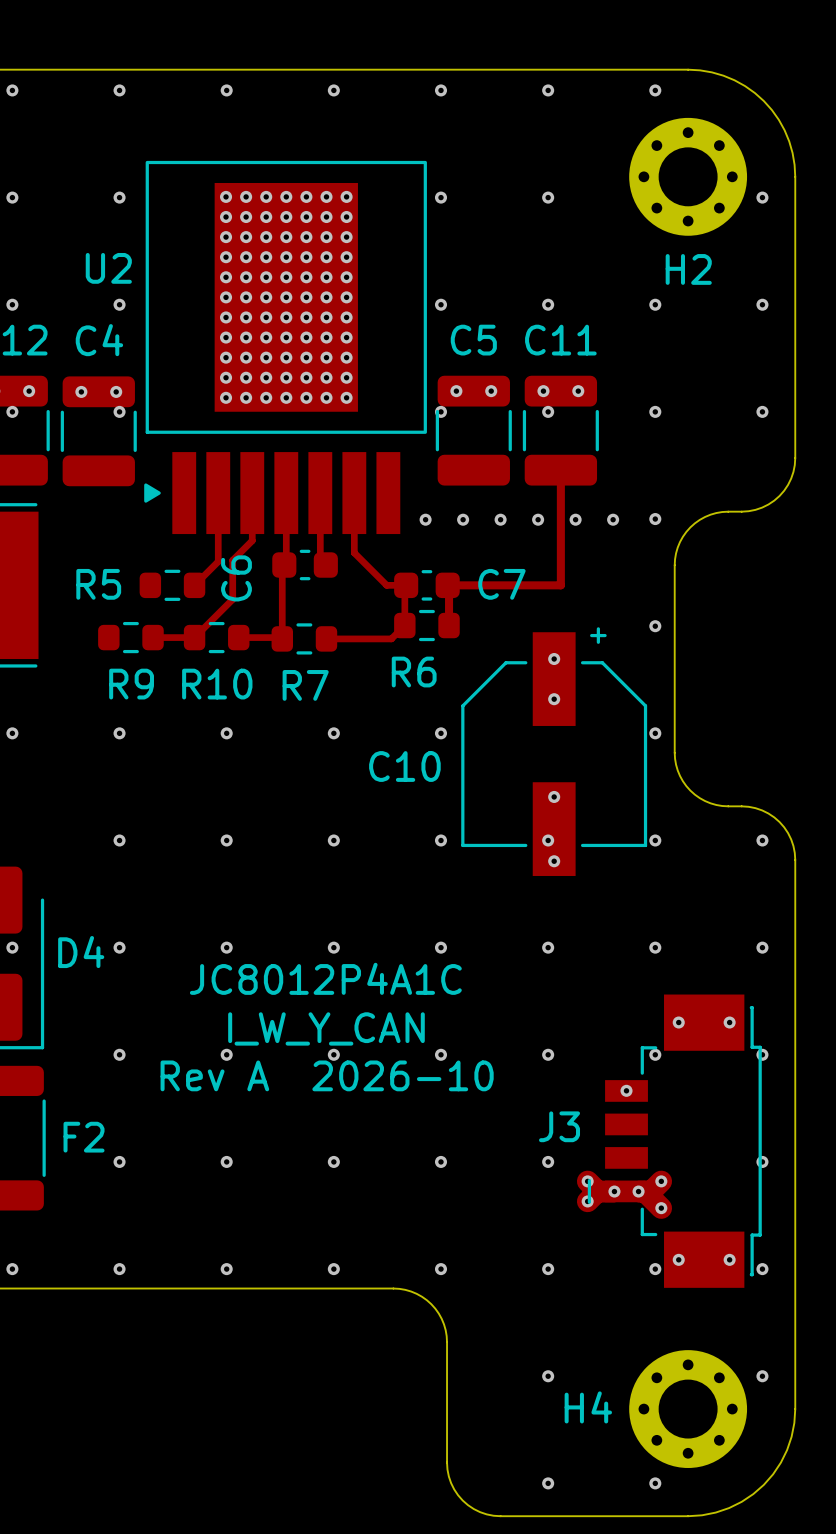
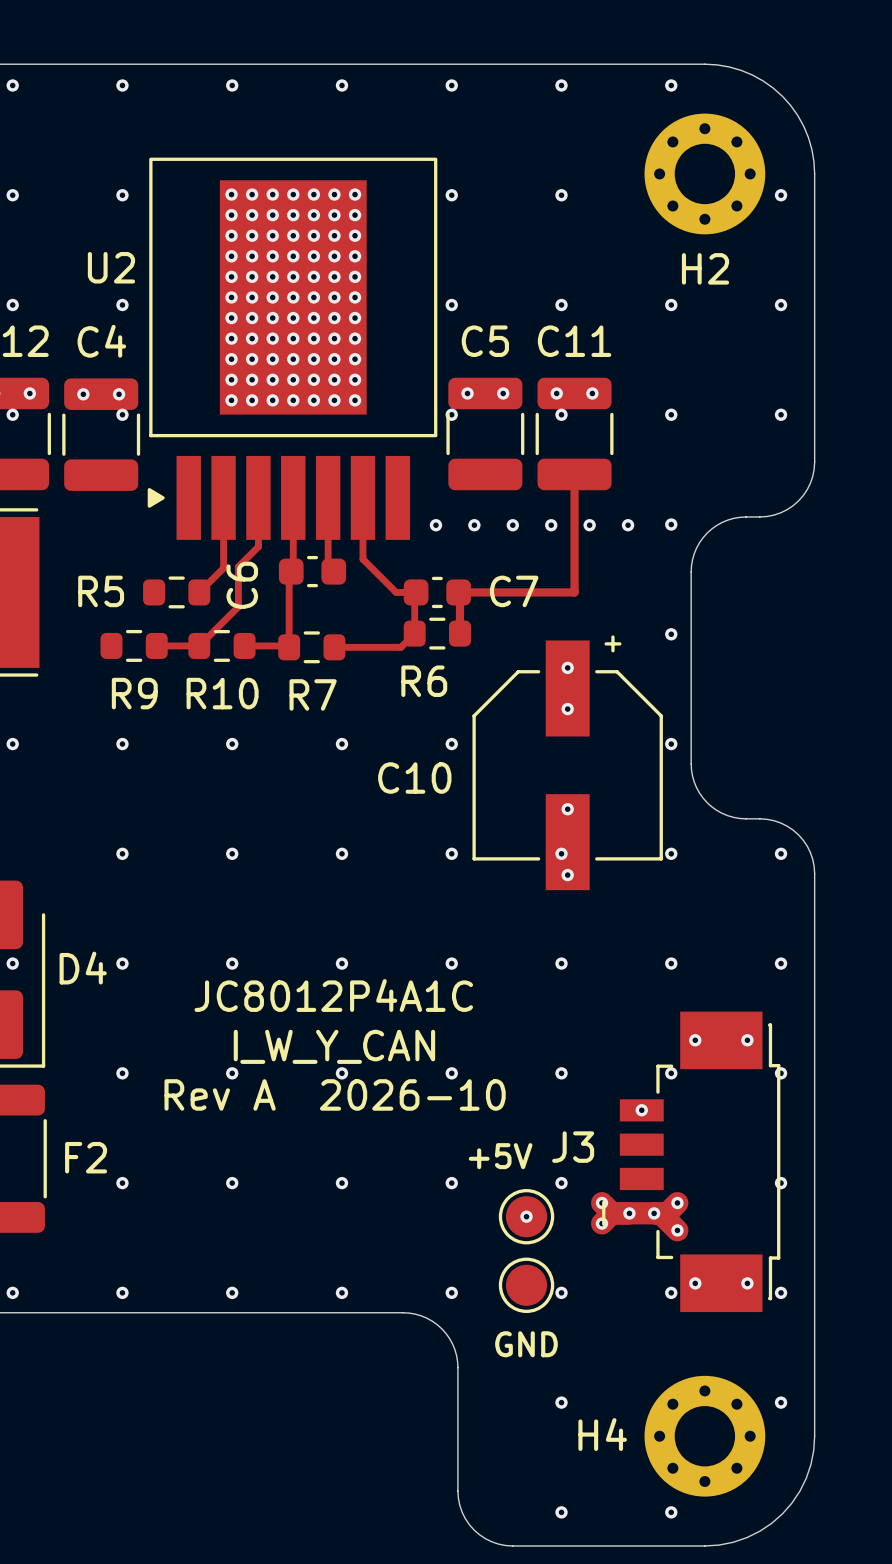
part: none -> +5V (526, 1216)
via: none -> (526, 1216)
part: none -> GND (526, 1285)

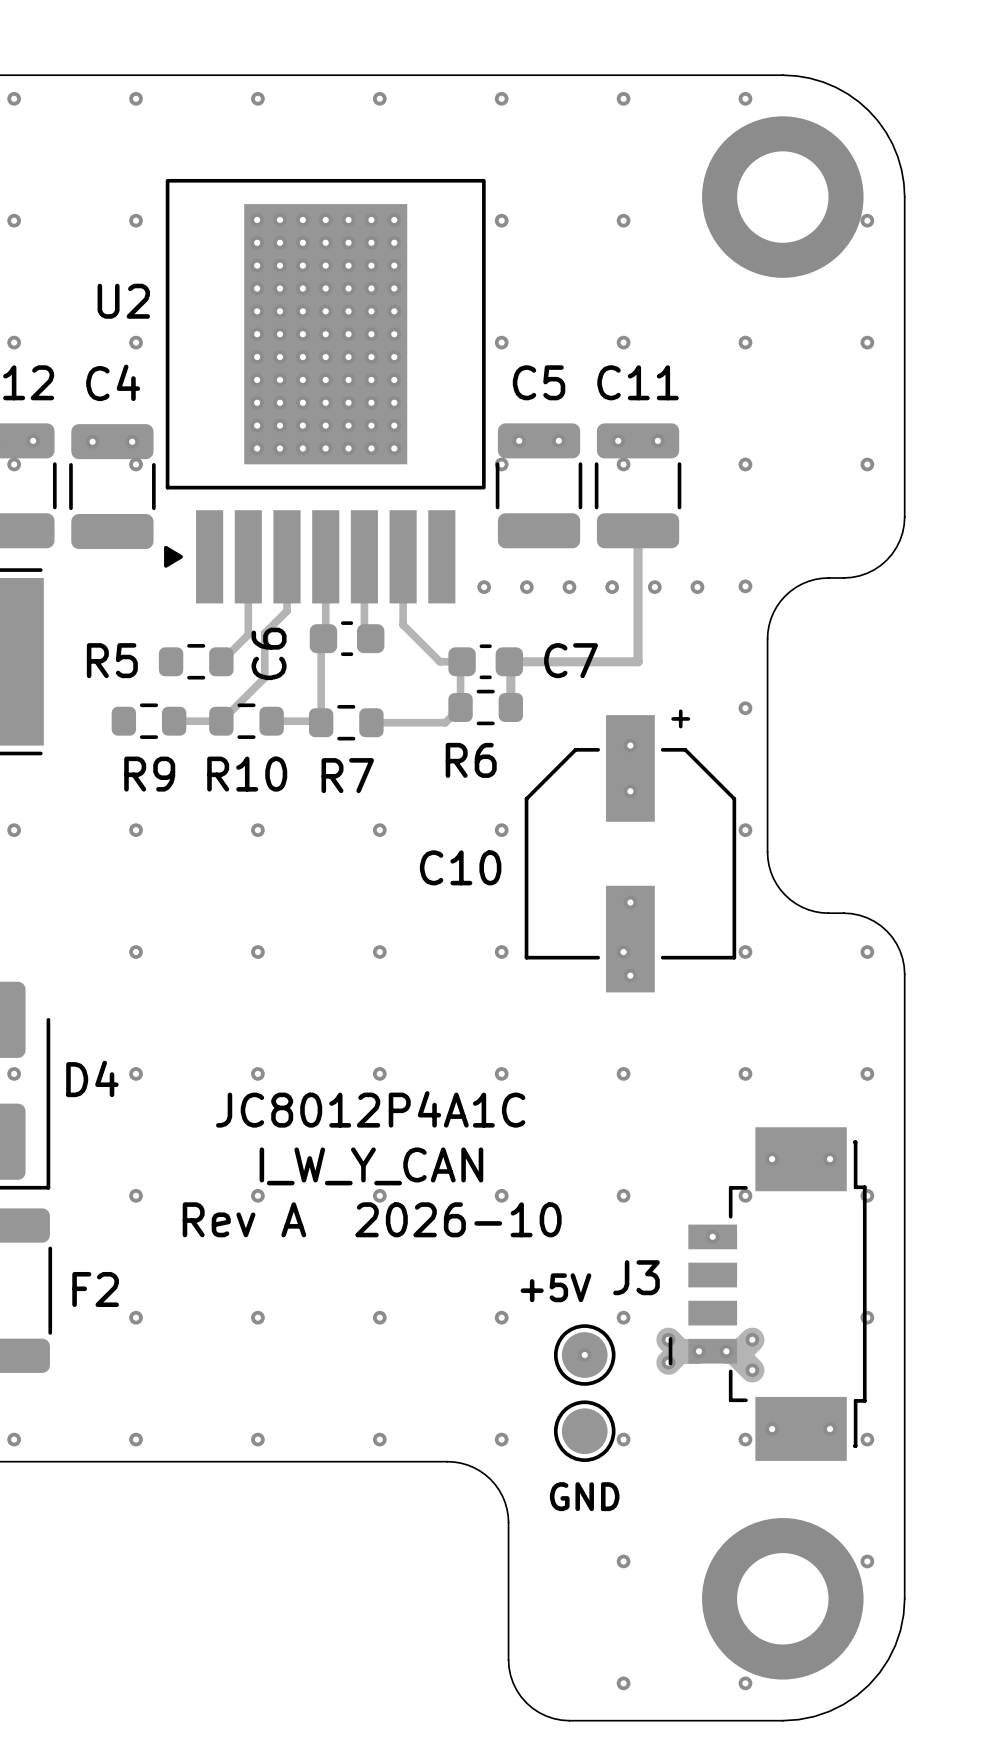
H2: (704, 173) -> none
part: none -> (782, 197)
H4: (704, 1436) -> none
part: none -> (782, 1598)

